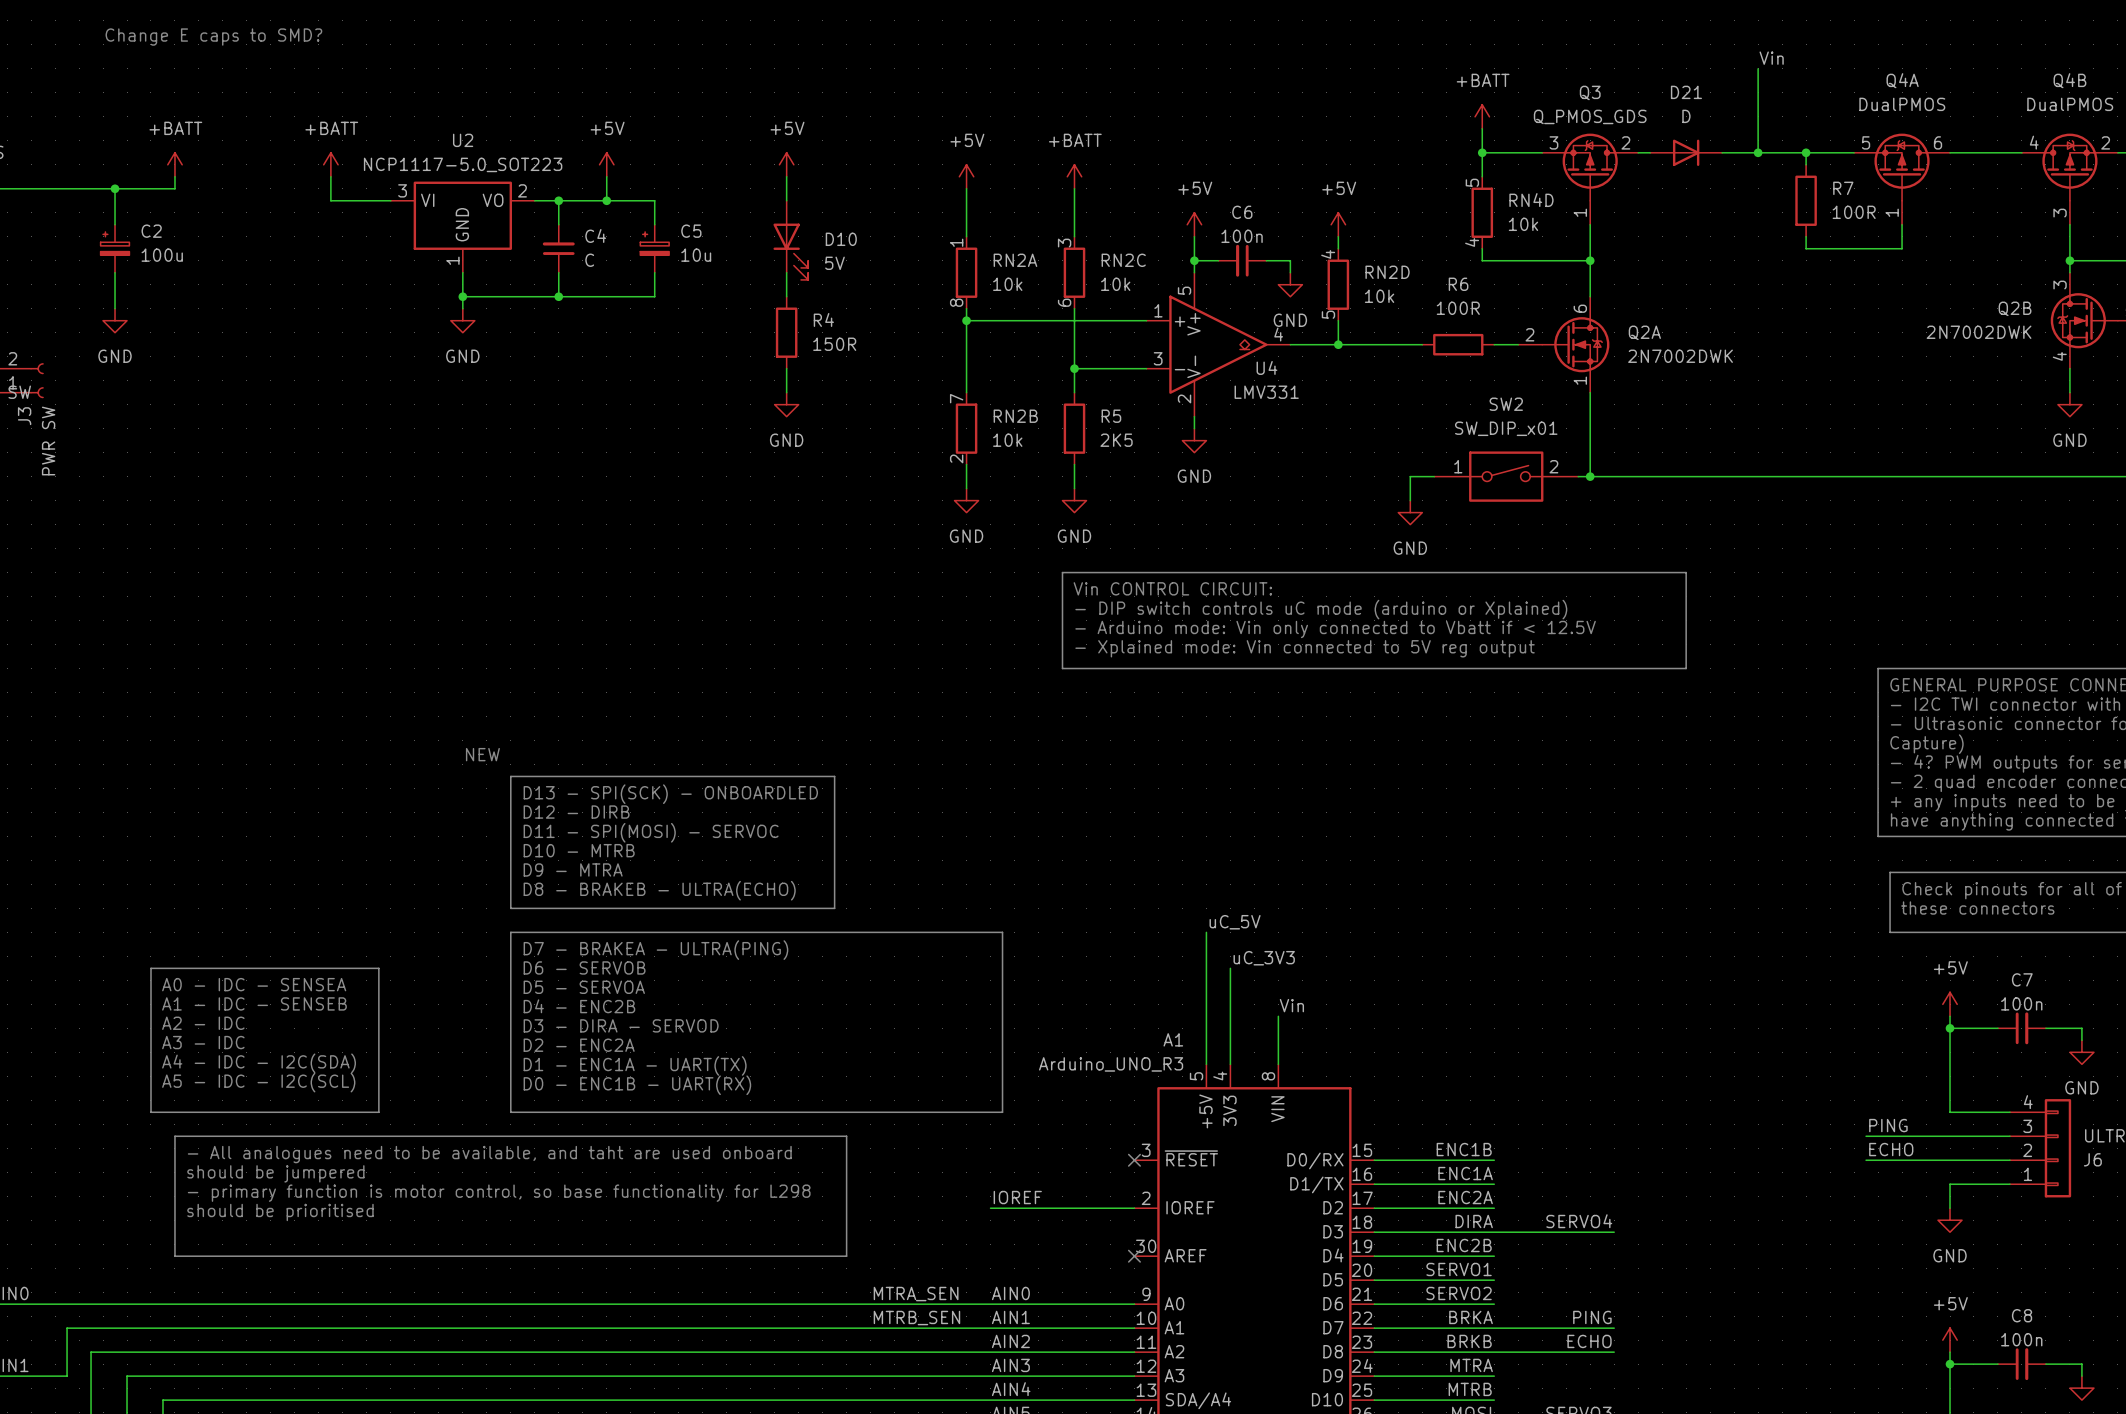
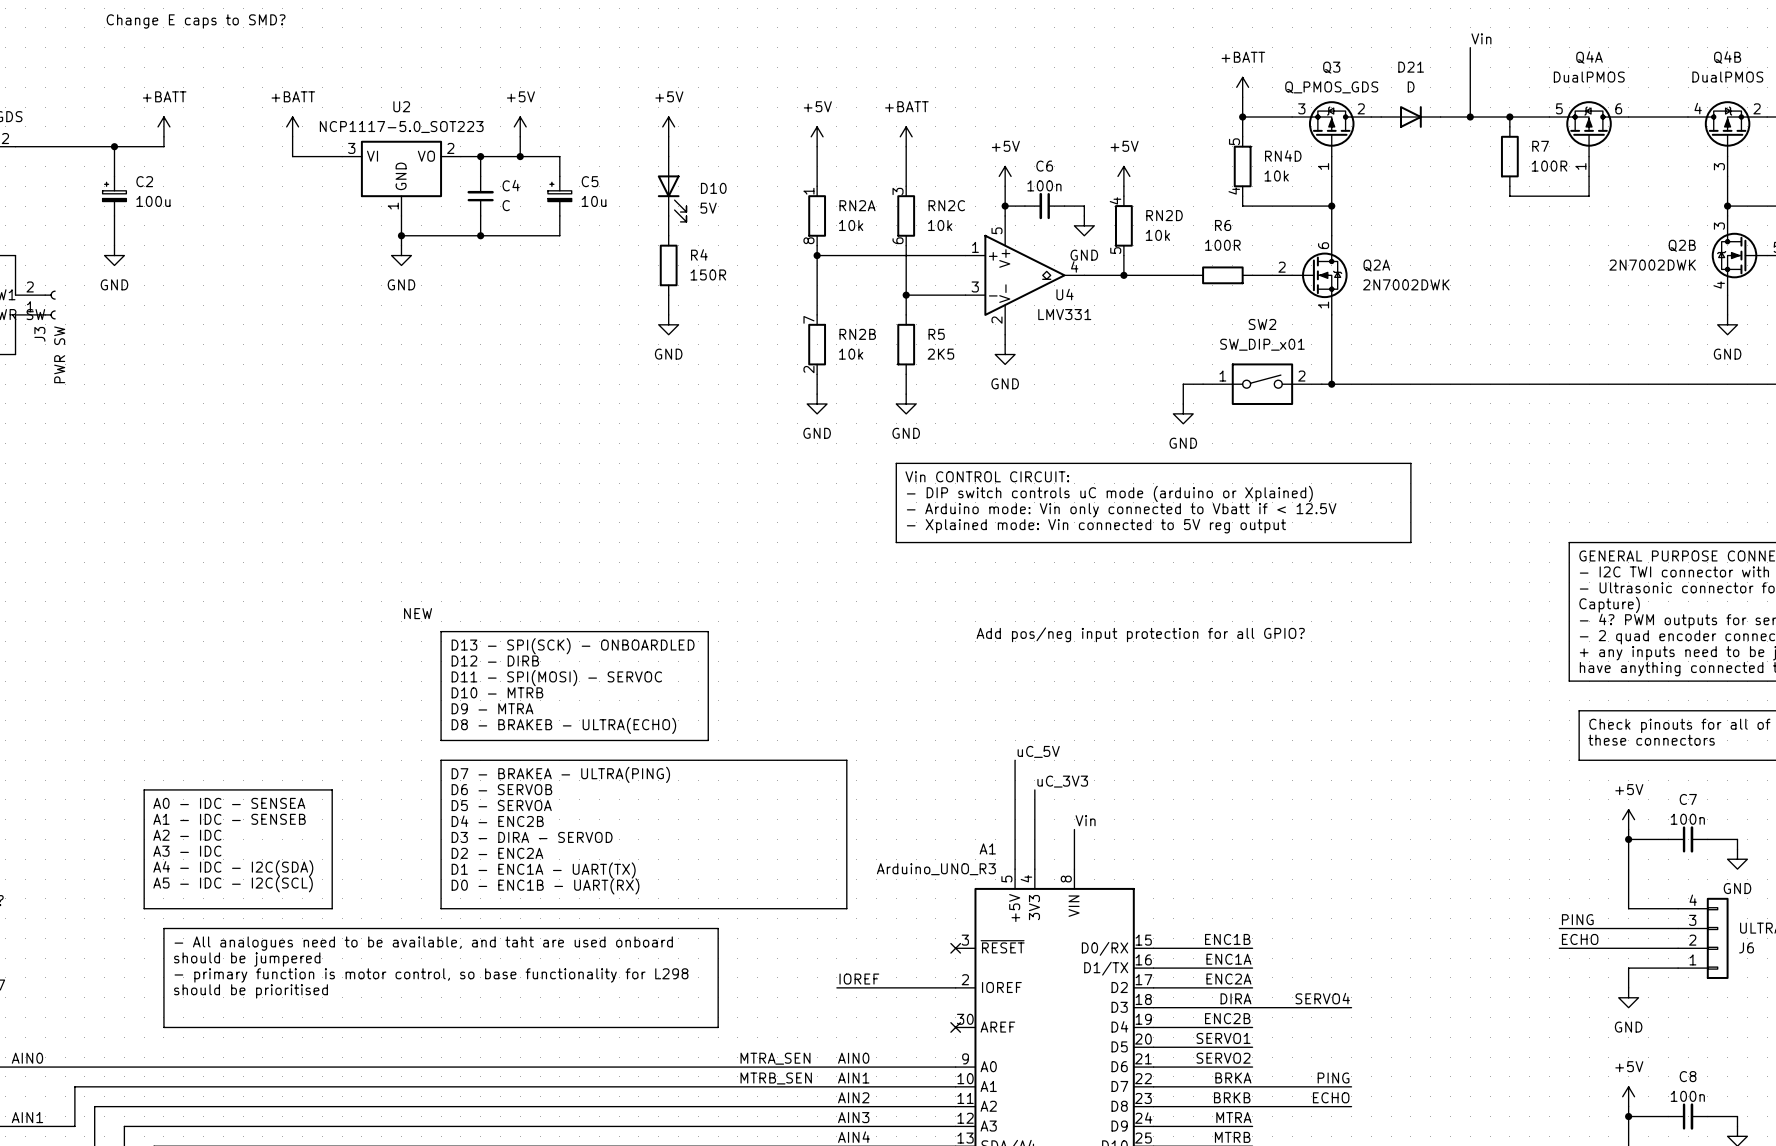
text: none -> Add pos/neg input protection for all GPIO? (1140, 634)

